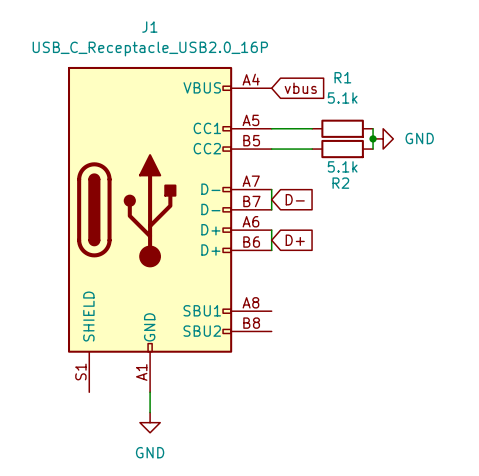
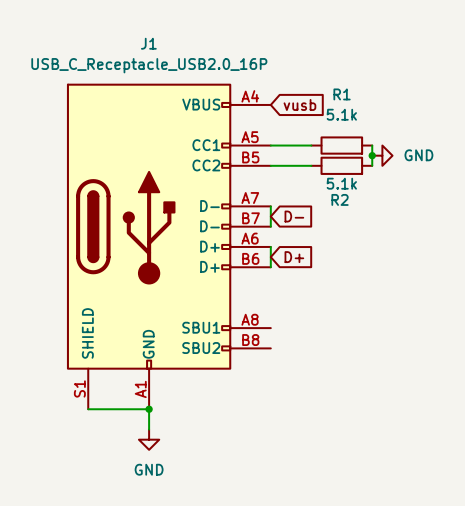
global label: vbus (300, 88) -> vusb (299, 104)
wire: none -> (88, 409) (149, 409)
junction: none -> (149, 409)

